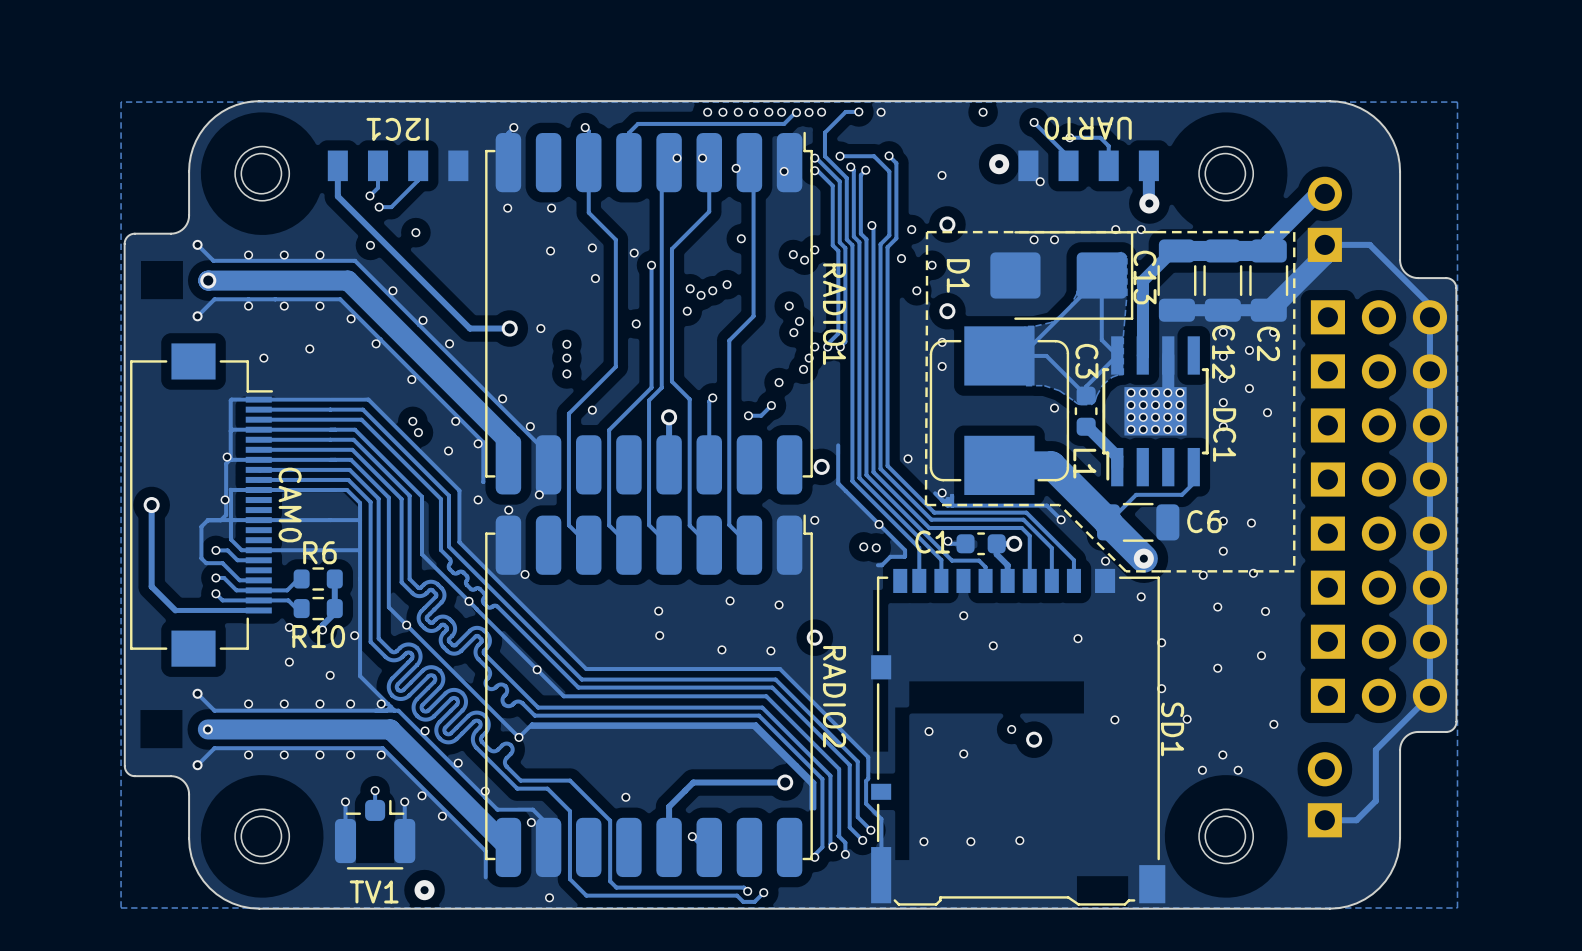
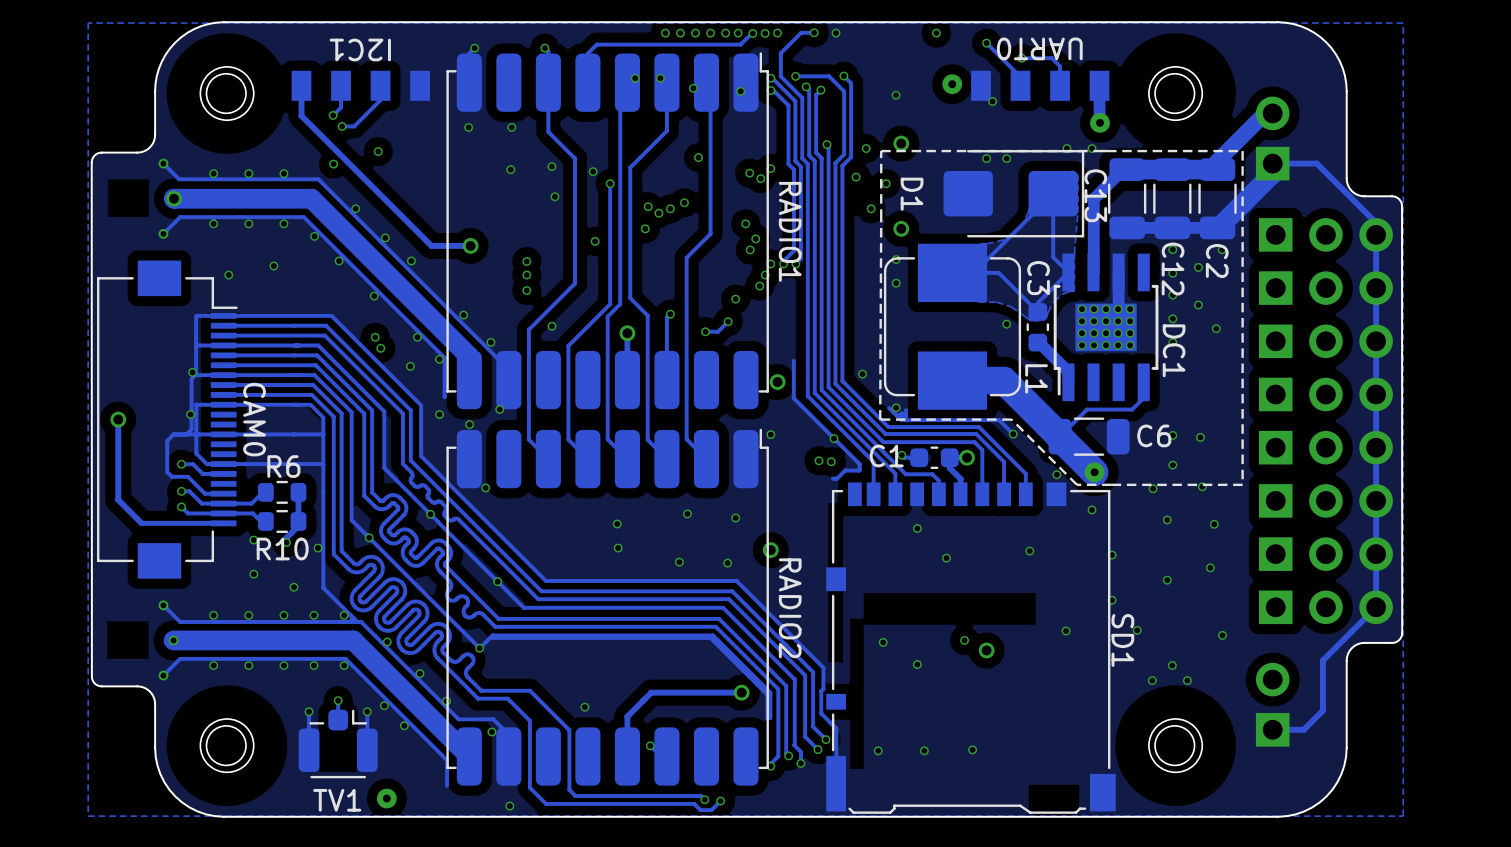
via: (540, 328) -> none

